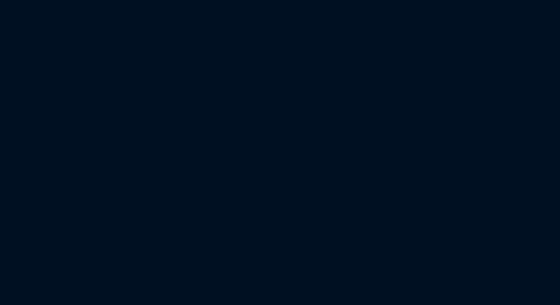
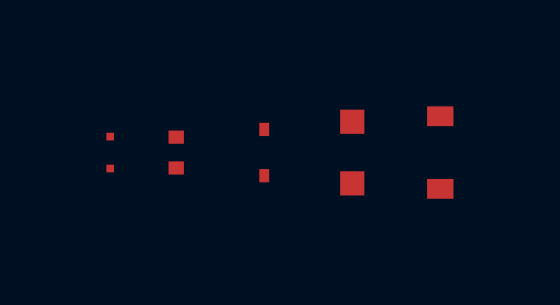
part: none -> (110, 152)
part: none -> (176, 152)
part: none -> (264, 152)
part: none -> (352, 152)
part: none -> (440, 152)

